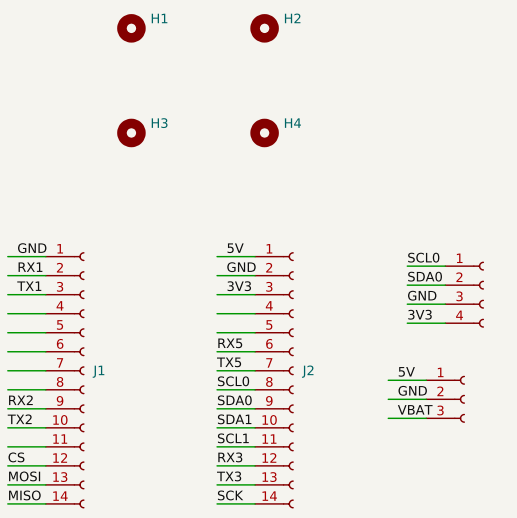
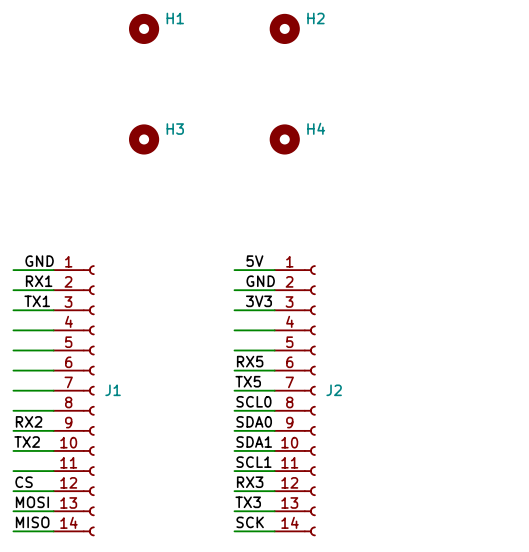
label: SCL0 (423, 257) -> none
wire: (407, 266) (445, 266) -> none
label: SDA0 (425, 276) -> none
wire: (407, 285) (445, 285) -> none
part: (464, 294) -> none
label: GND (422, 295) -> none
wire: (407, 304) (445, 304) -> none
label: 3V3 (420, 314) -> none
wire: (407, 323) (445, 323) -> none
label: 5V (406, 371) -> none
wire: (388, 380) (426, 380) -> none
label: GND (412, 390) -> none
wire: (388, 399) (426, 399) -> none
part: (445, 399) -> none
label: VBAT (415, 409) -> none
wire: (388, 418) (426, 418) -> none

